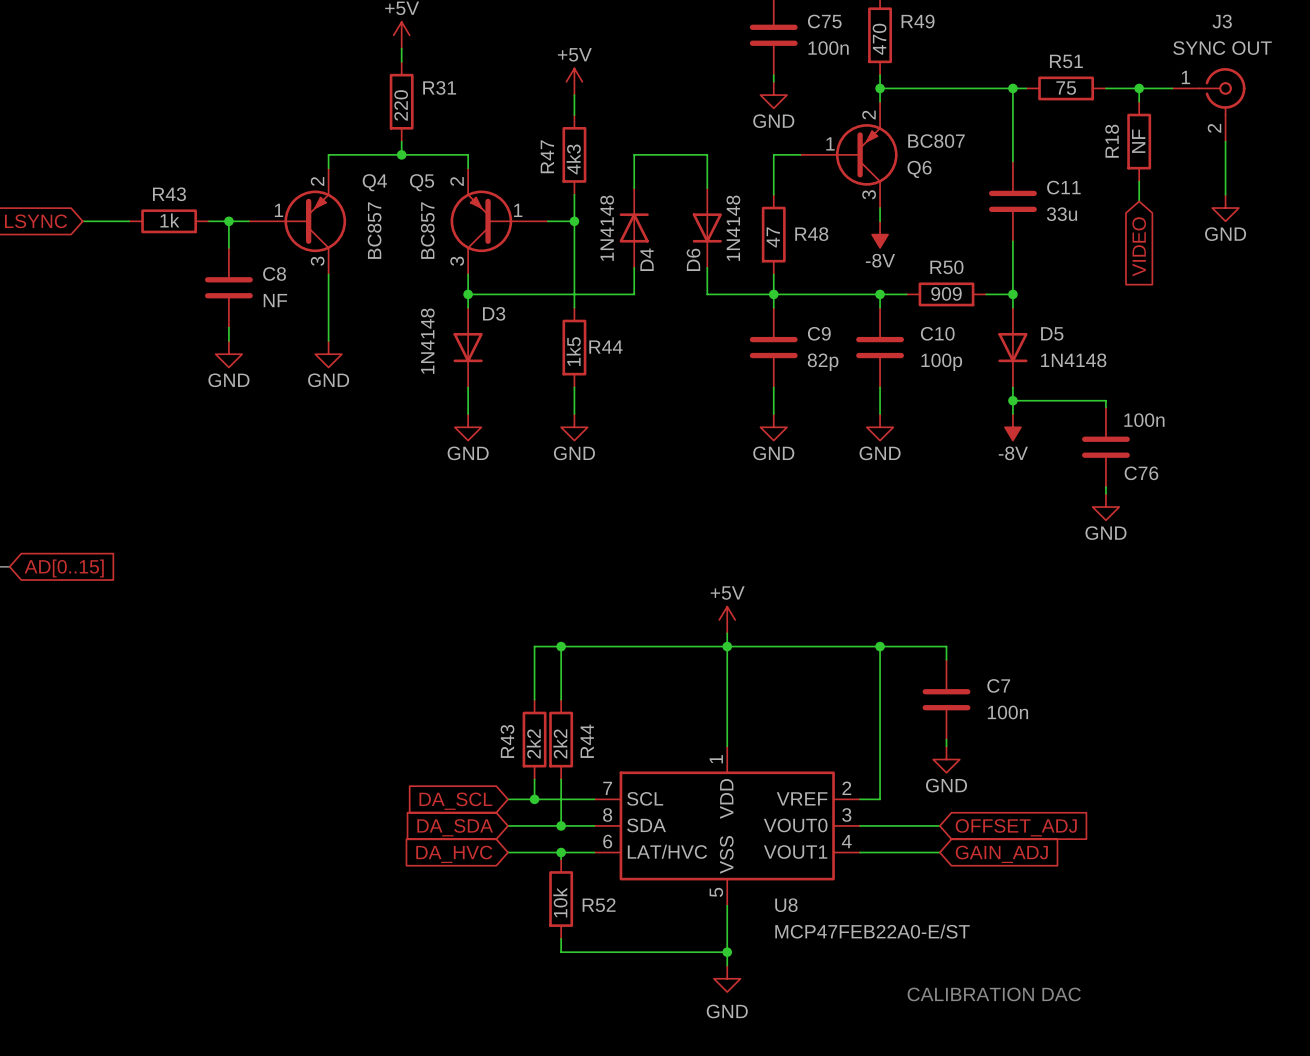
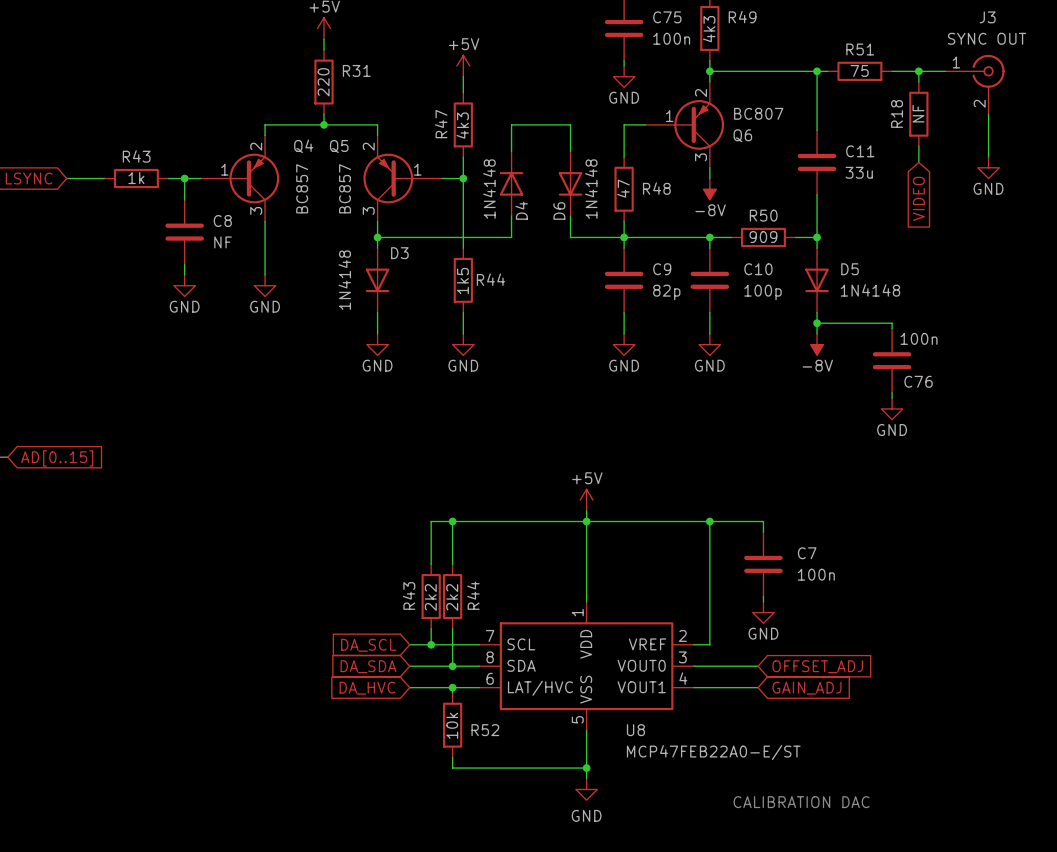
R49 value: 470 (879, 39) -> 4k3 (709, 29)

